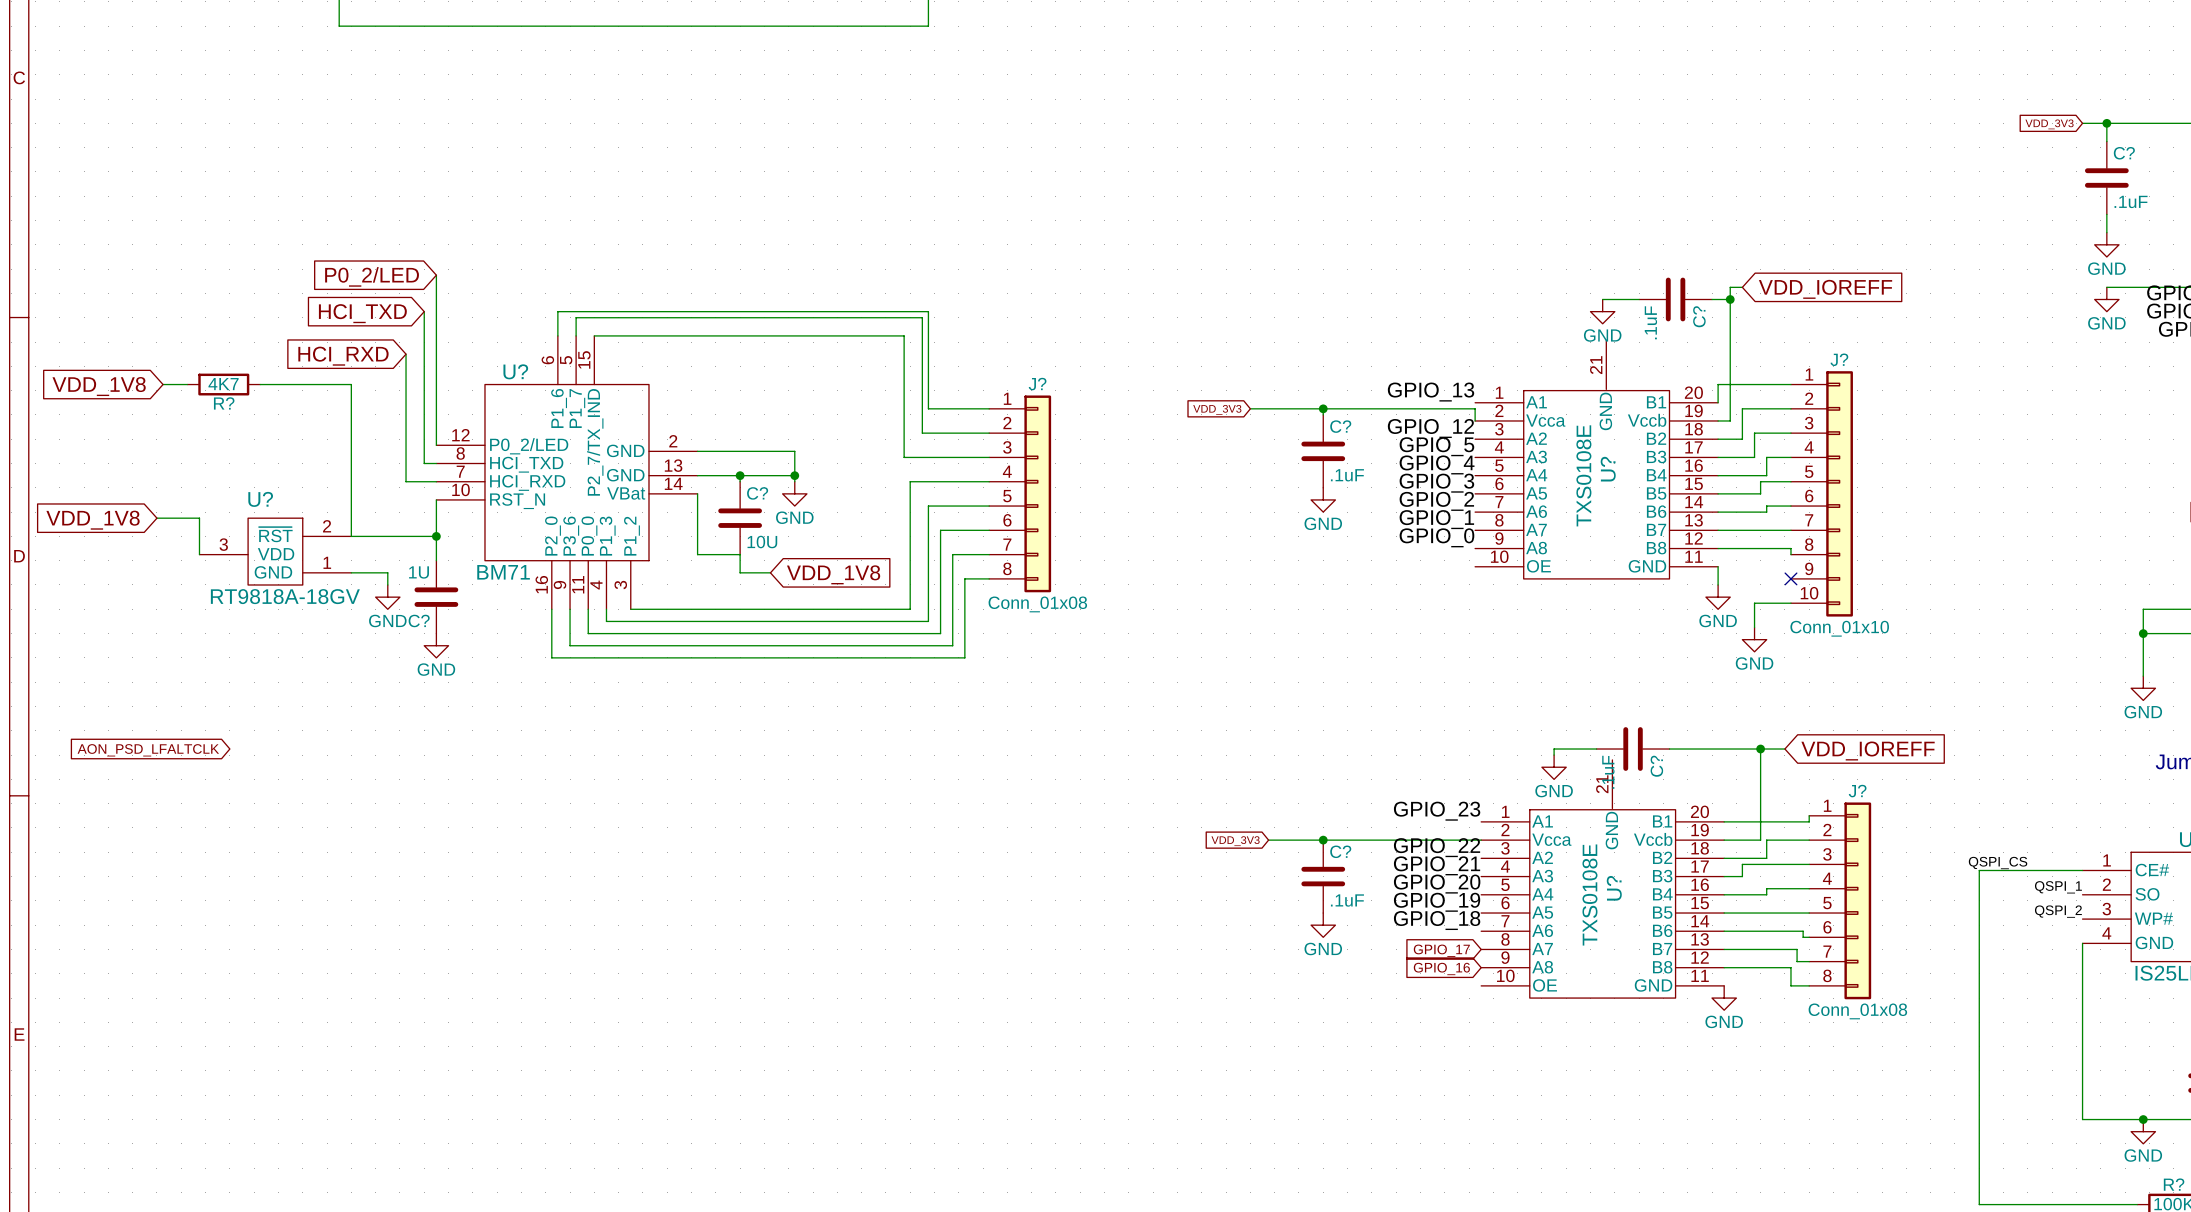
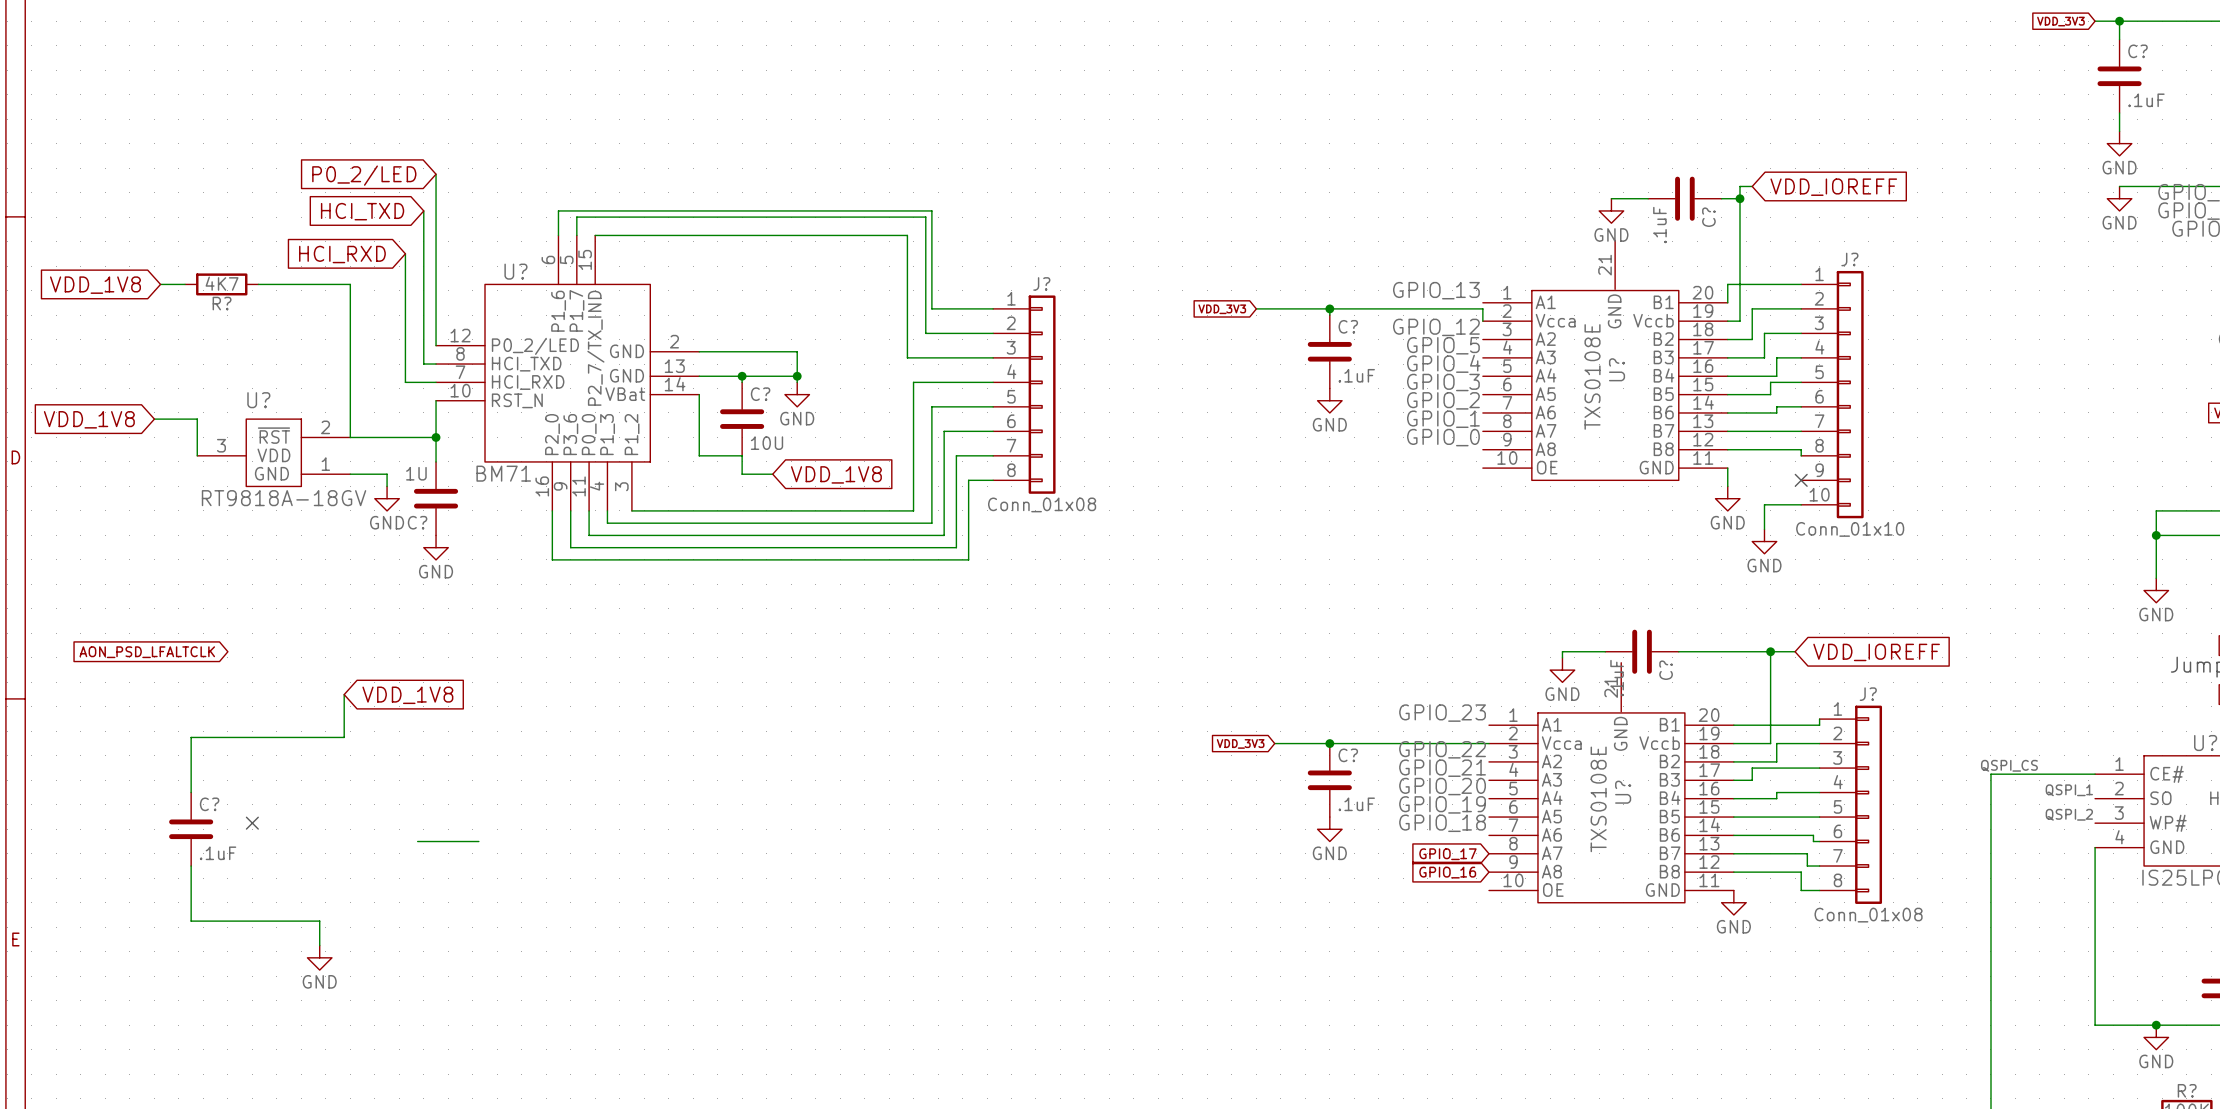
wire: none -> (344, 694) (344, 737) (191, 737) (191, 792)
global label: none -> VDD_1V8 (407, 695)
no-connect mark: none -> (252, 823)
C?: none -> .1uF (191, 829)
wire: none -> (417, 841) (478, 841)
wire: none -> (191, 866) (191, 921) (319, 921) (319, 945)
power symbol: none -> GND (319, 957)

